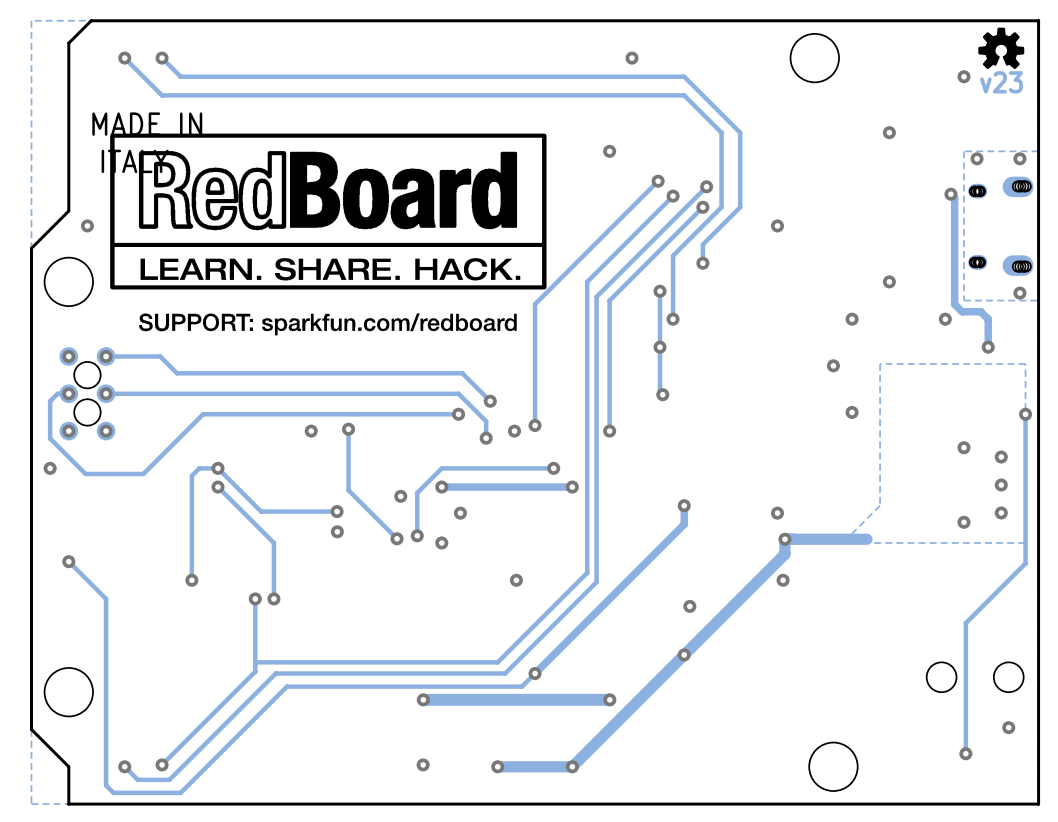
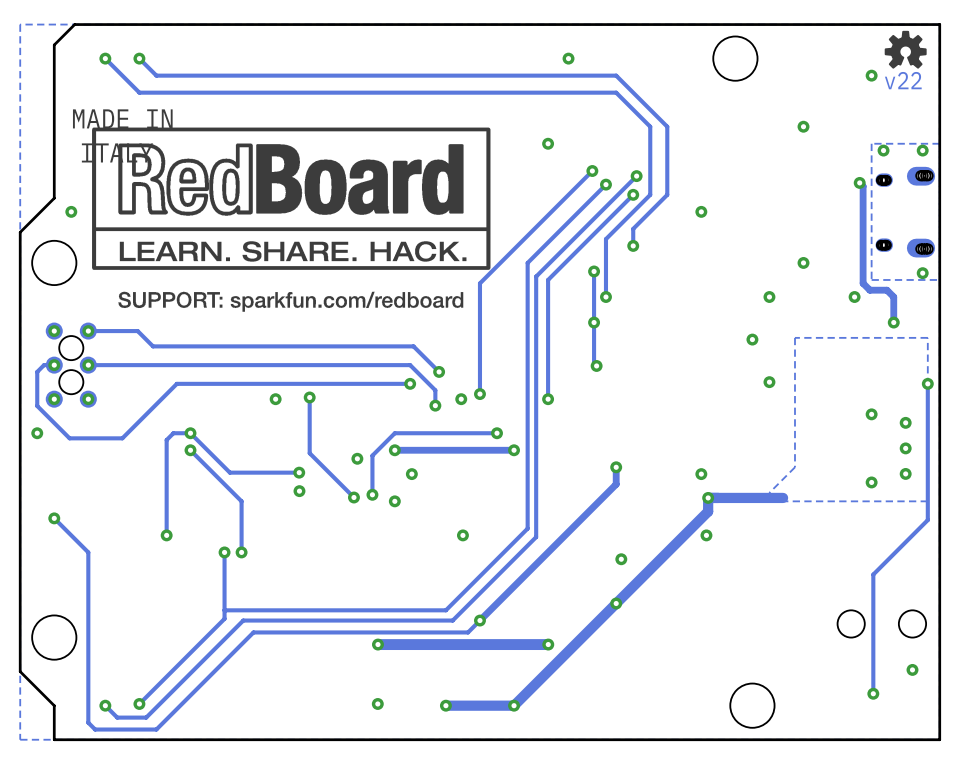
text: v23 (1001, 82) -> v22 (903, 80)

